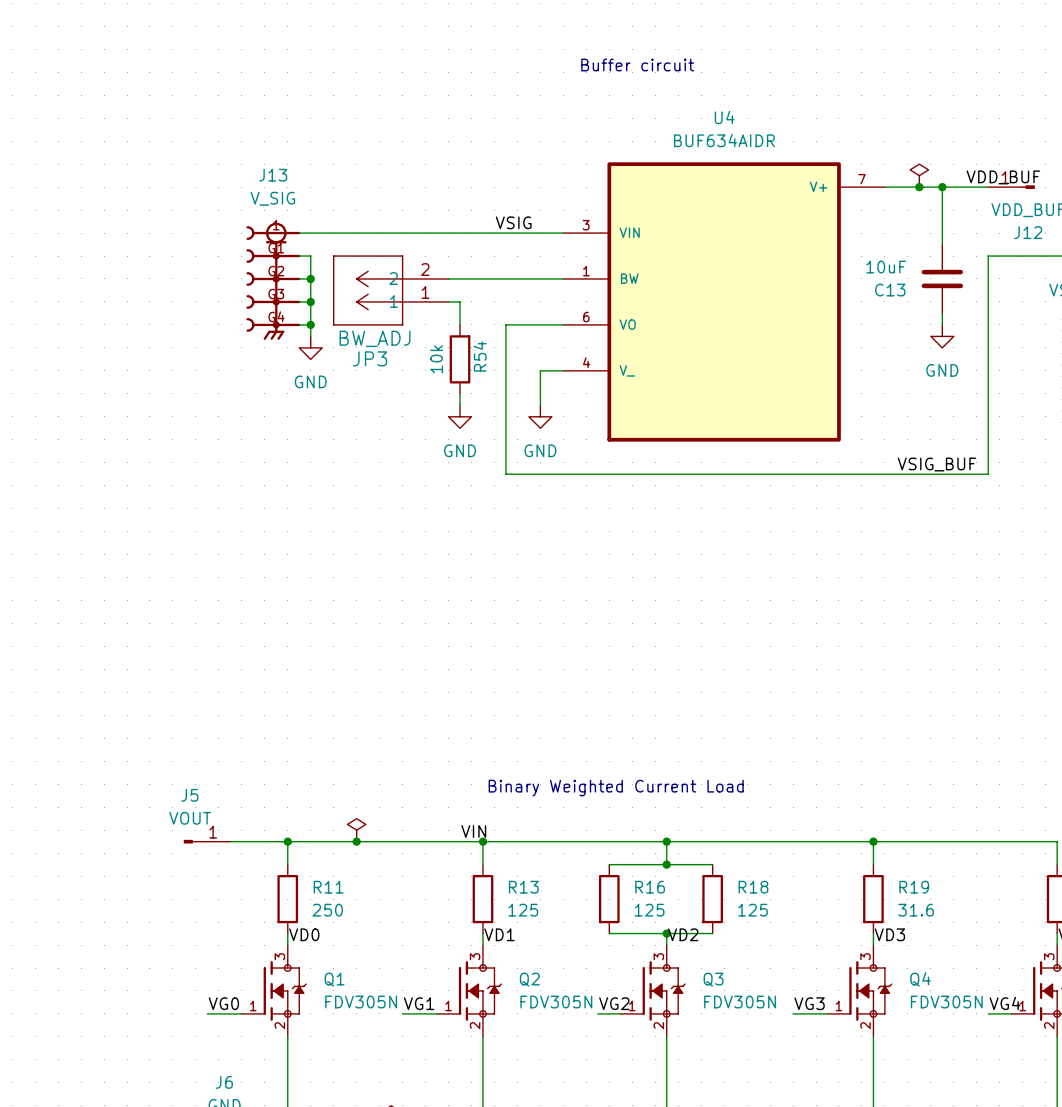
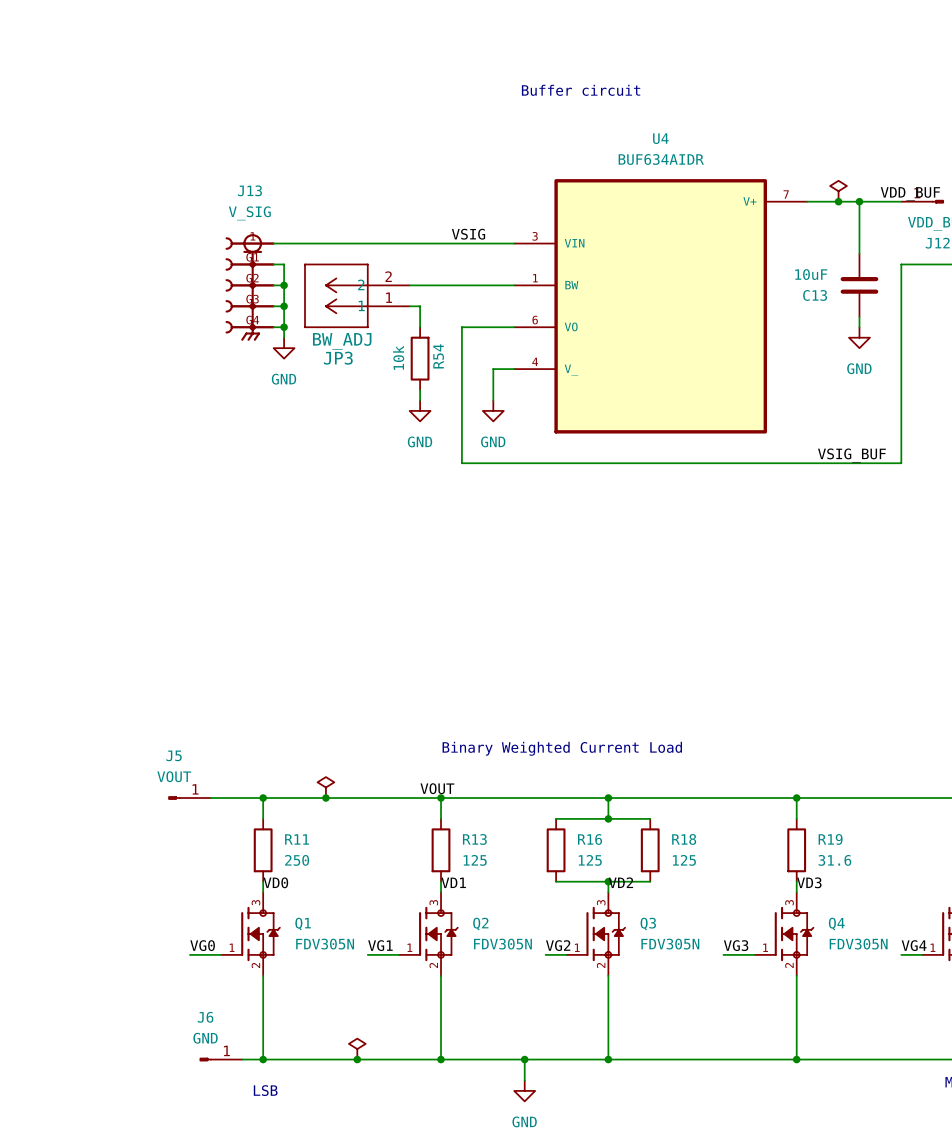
label: VIN (473, 831) -> VOUT (437, 788)

